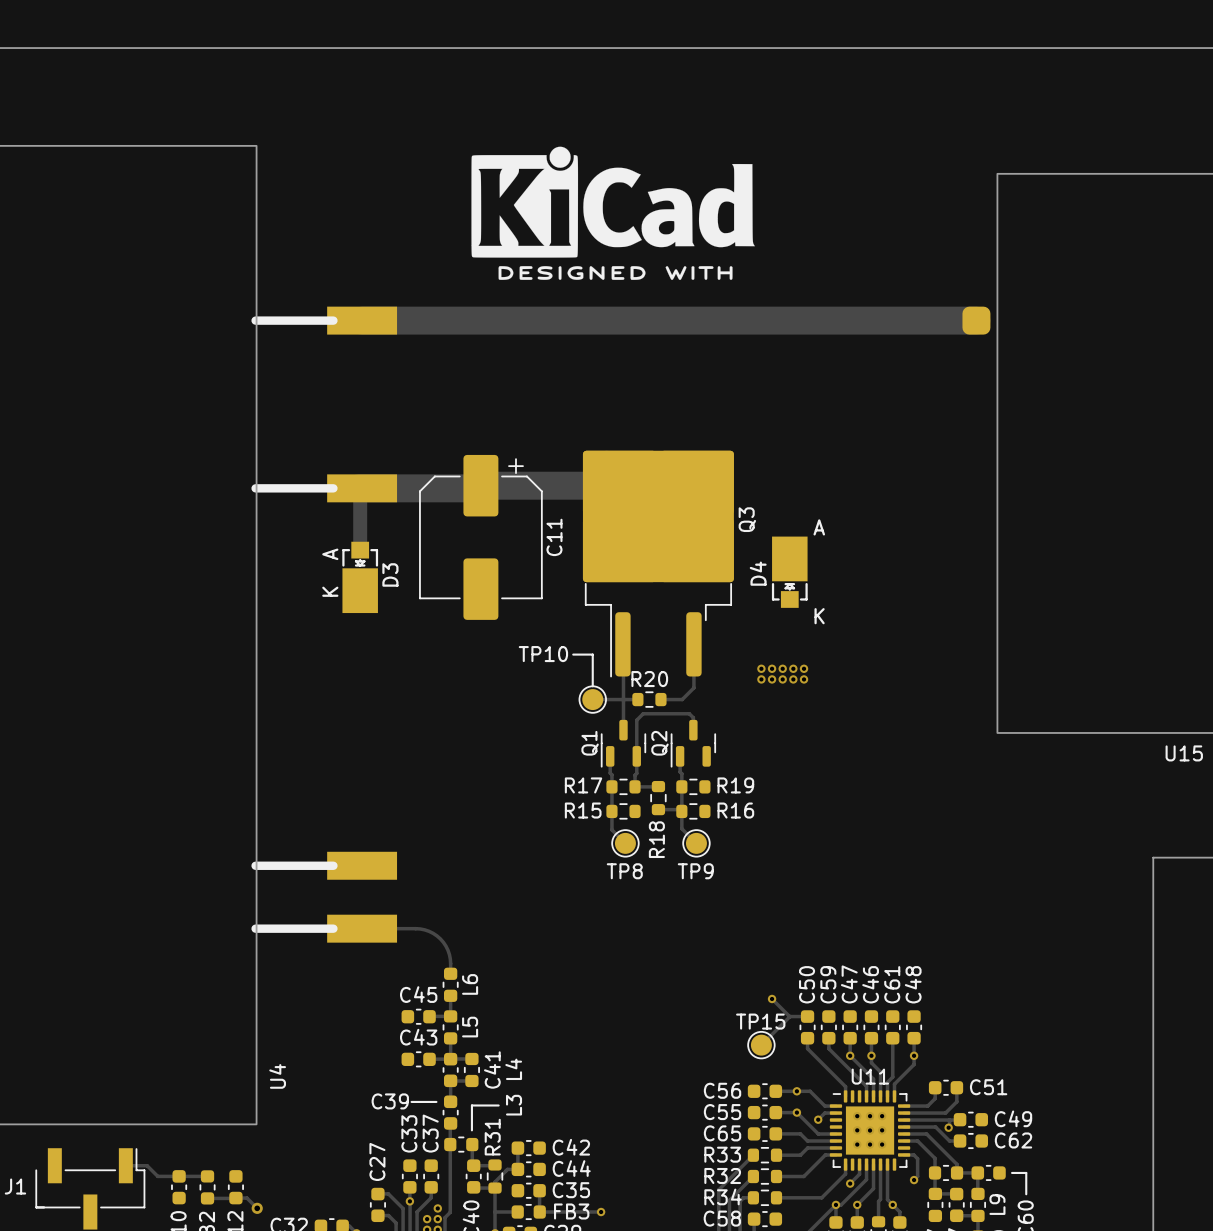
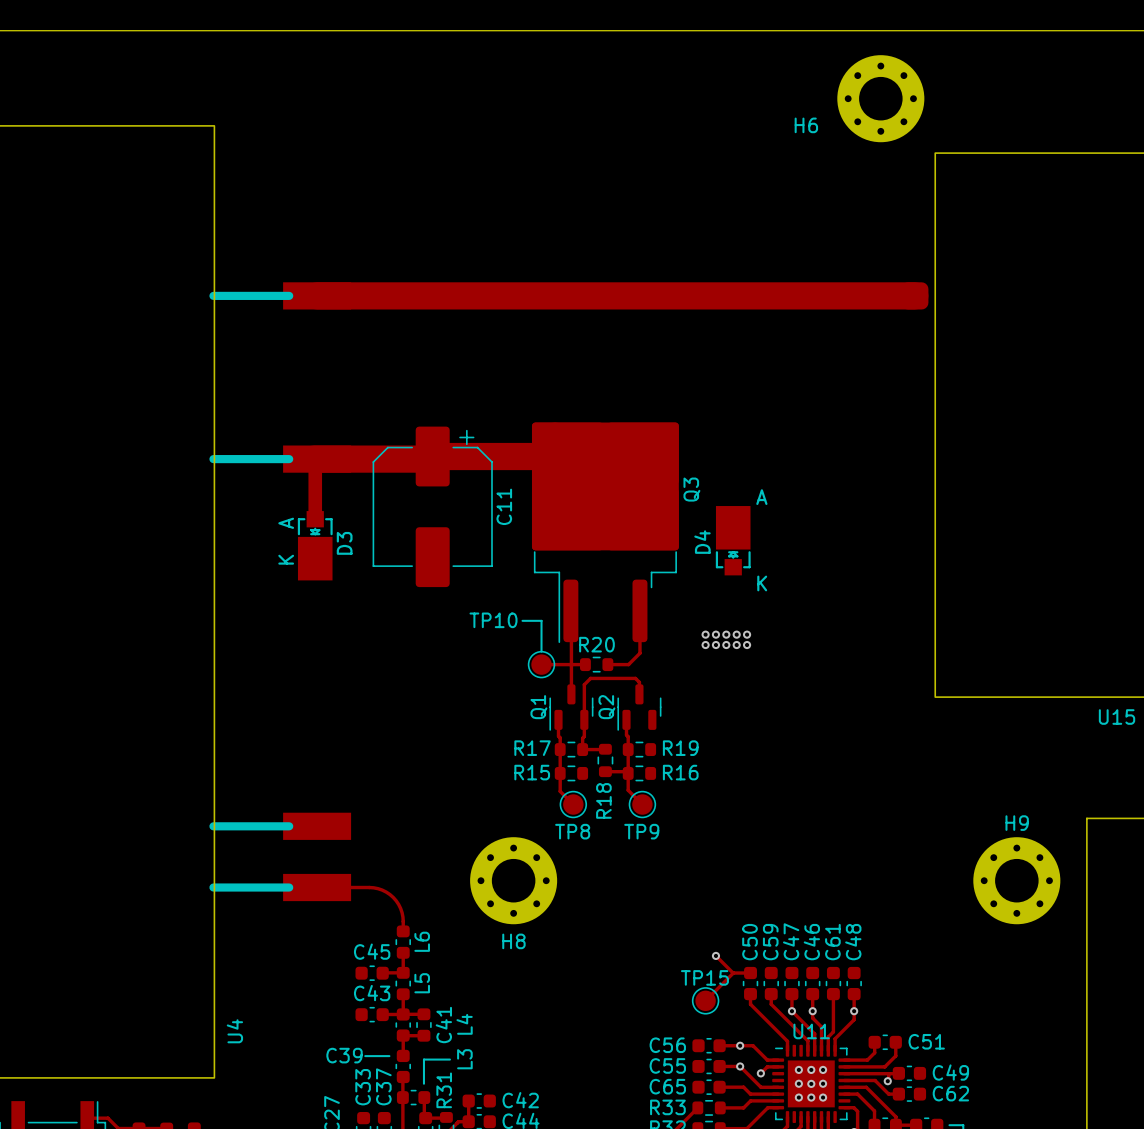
H6: none -> (880, 98)
drawing: [471, 146, 755, 280] -> none
H8: none -> (513, 880)
H9: none -> (1016, 880)

